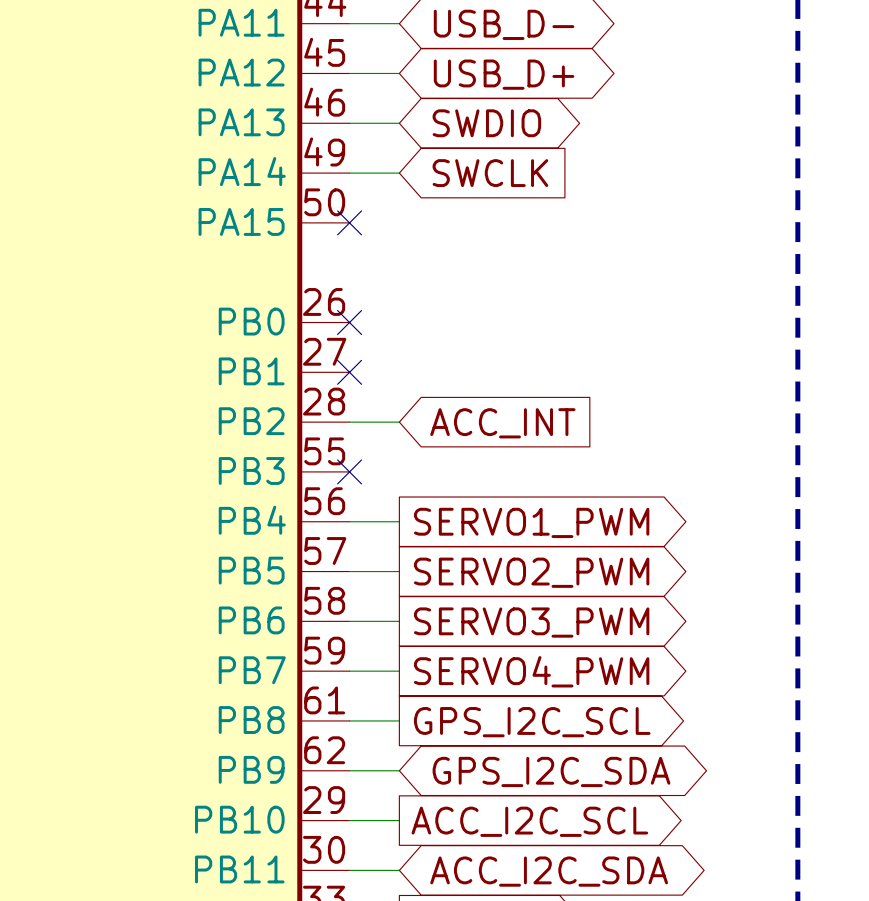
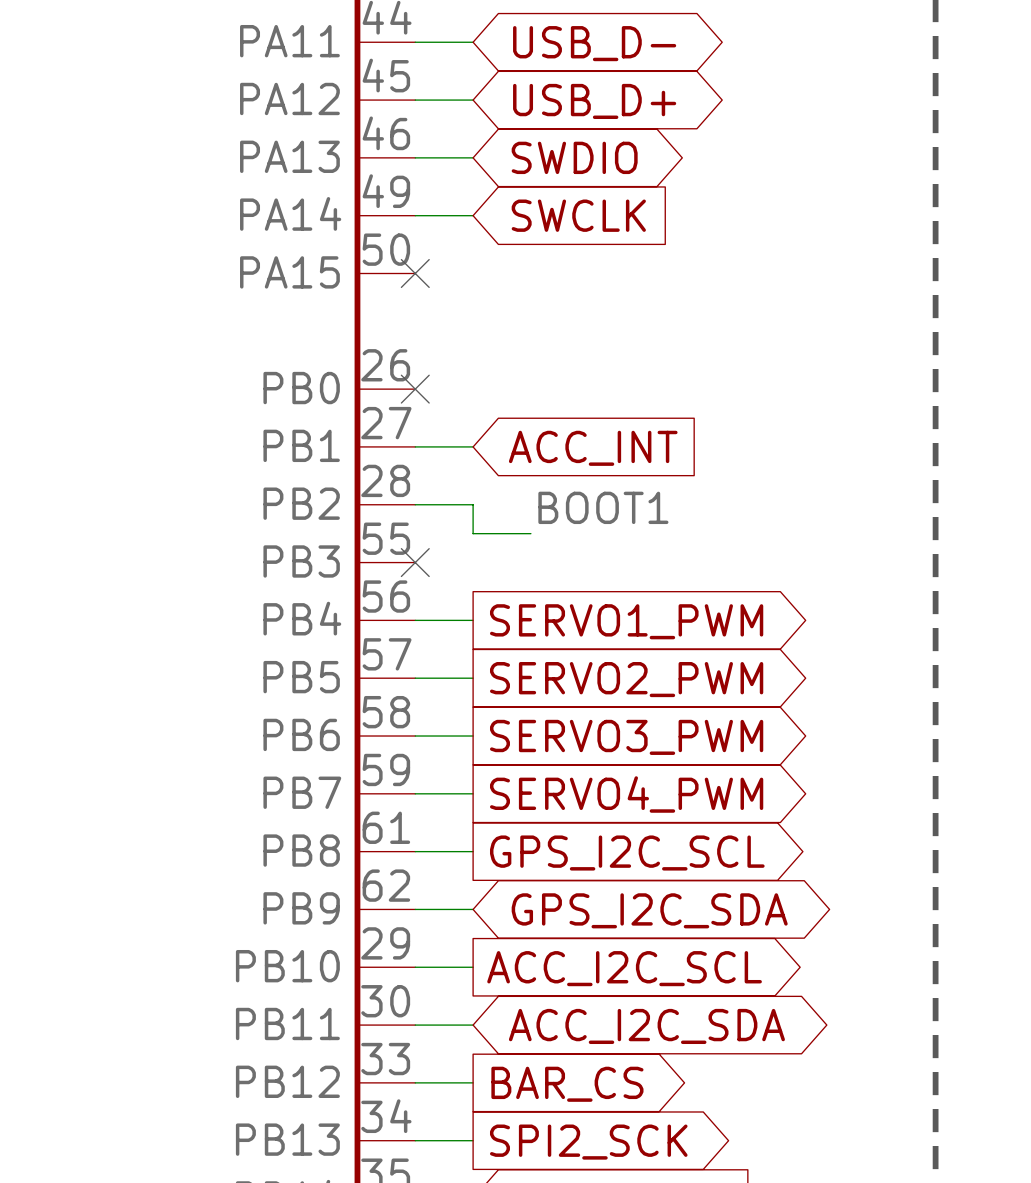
wire: none -> (415, 446) (473, 446)
no-connect mark: (349, 372) -> none
wire: none -> (473, 504) (473, 533) (530, 533)
global label position: ACC_INT (502, 423) -> ACC_INT (593, 448)
label: none -> BOOT1 (603, 507)

